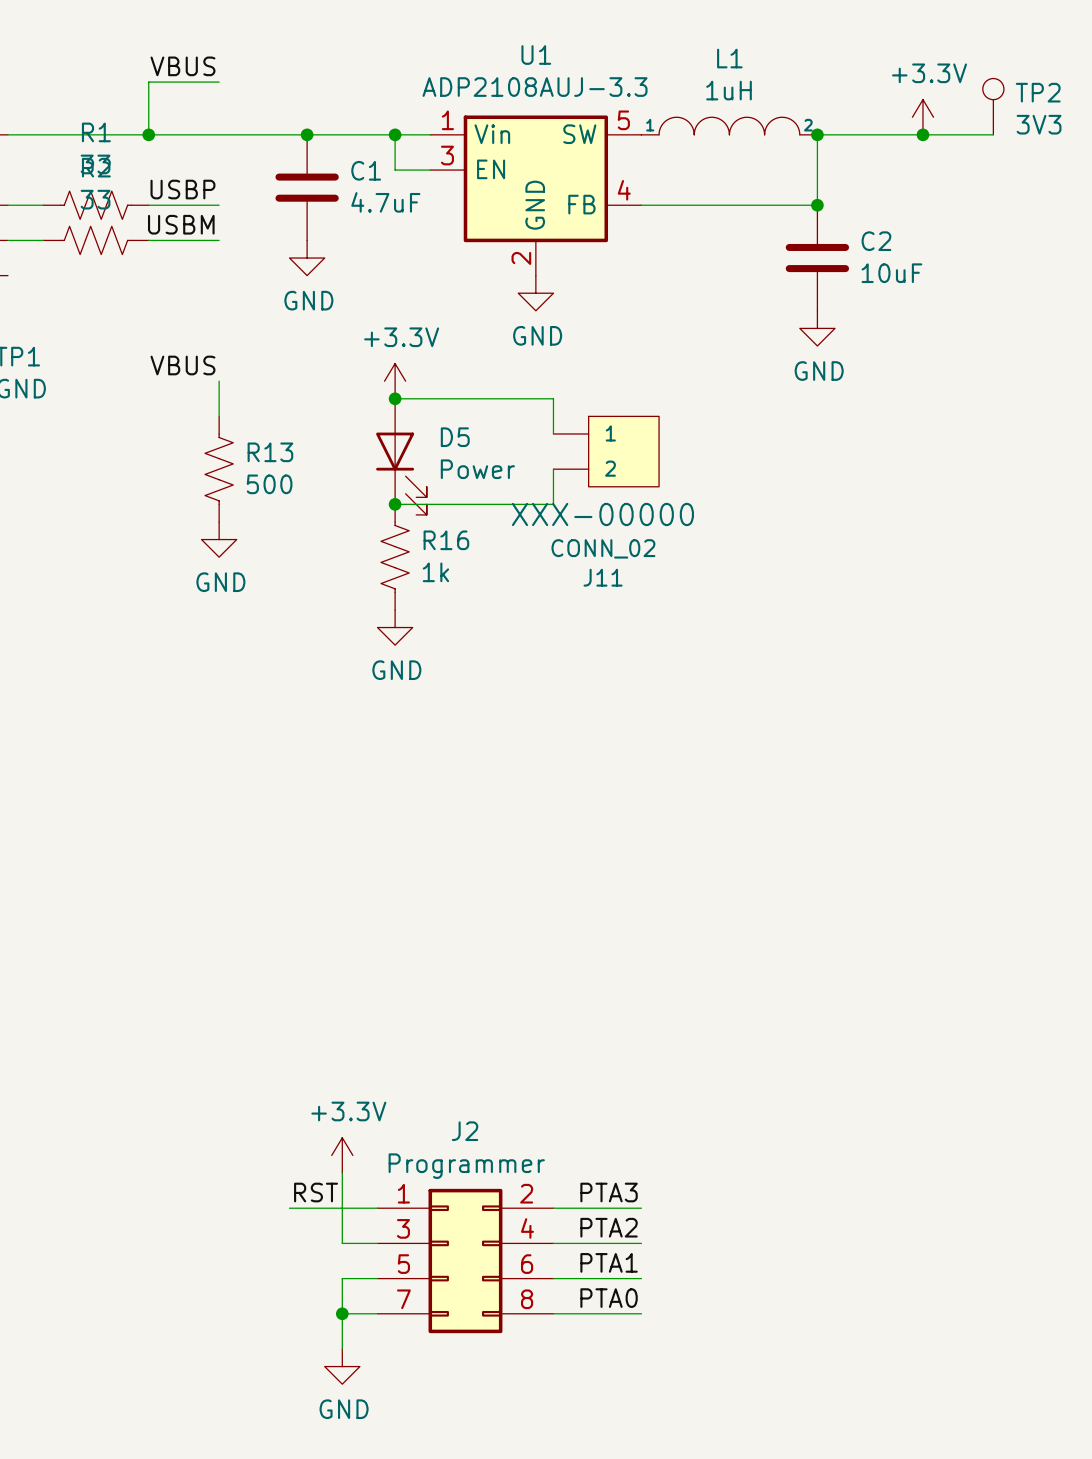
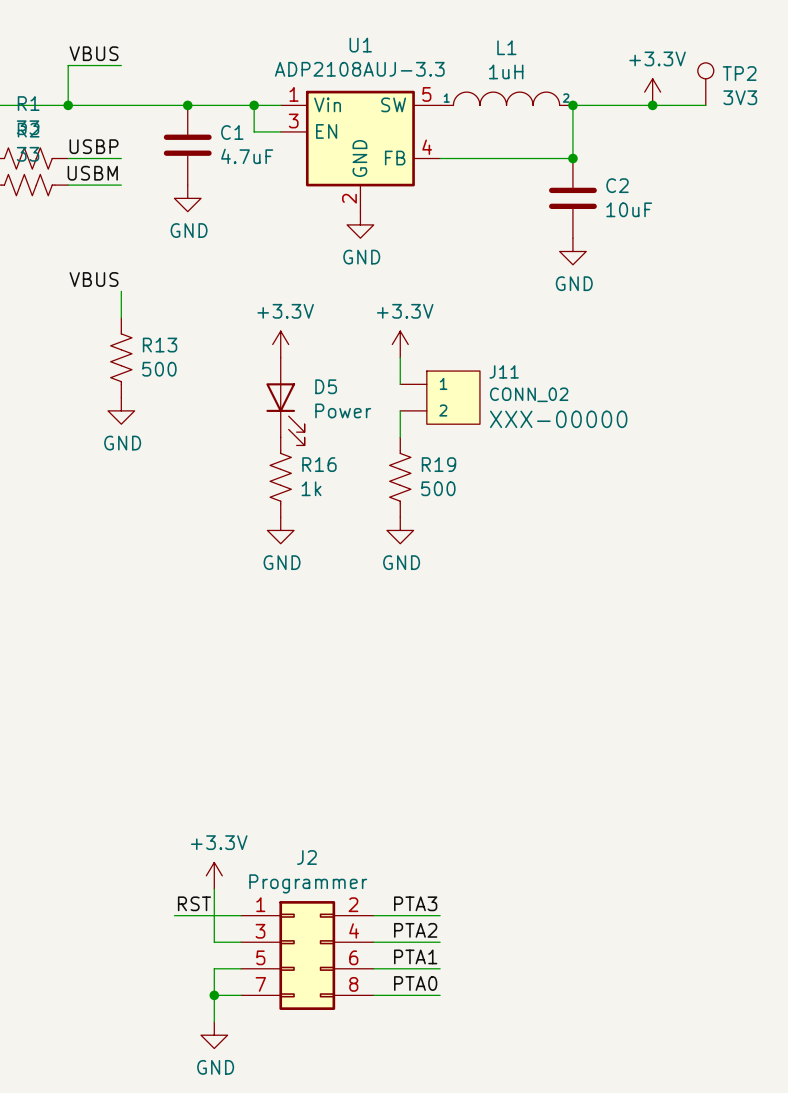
power symbol position: +3.3V (395, 381) -> +3.3V (280, 344)
wire: (395, 398) (553, 398) (553, 433) -> none
junction: (395, 398) -> none
power symbol: none -> +3.3V (400, 344)
J11 position: (606, 451) -> (440, 397)
D5 position: (401, 456) -> (285, 401)
wire: (553, 469) (553, 504) (395, 504) -> none
wire: none -> (400, 357) (400, 384)
junction: (395, 504) -> none
J11 text position: XXX-00000 (602, 514) -> XXX-00000 (558, 419)
wire: none -> (400, 410) (400, 437)
J11 value position: CONN_02 (603, 548) -> CONN_02 (529, 394)
R16 position: (395, 557) -> (280, 477)
J11 name position: J11 (603, 577) -> J11 (504, 371)
power symbol position: GND (395, 627) -> GND (280, 530)
R19: none -> 500 (400, 477)
power symbol: none -> GND (400, 530)

